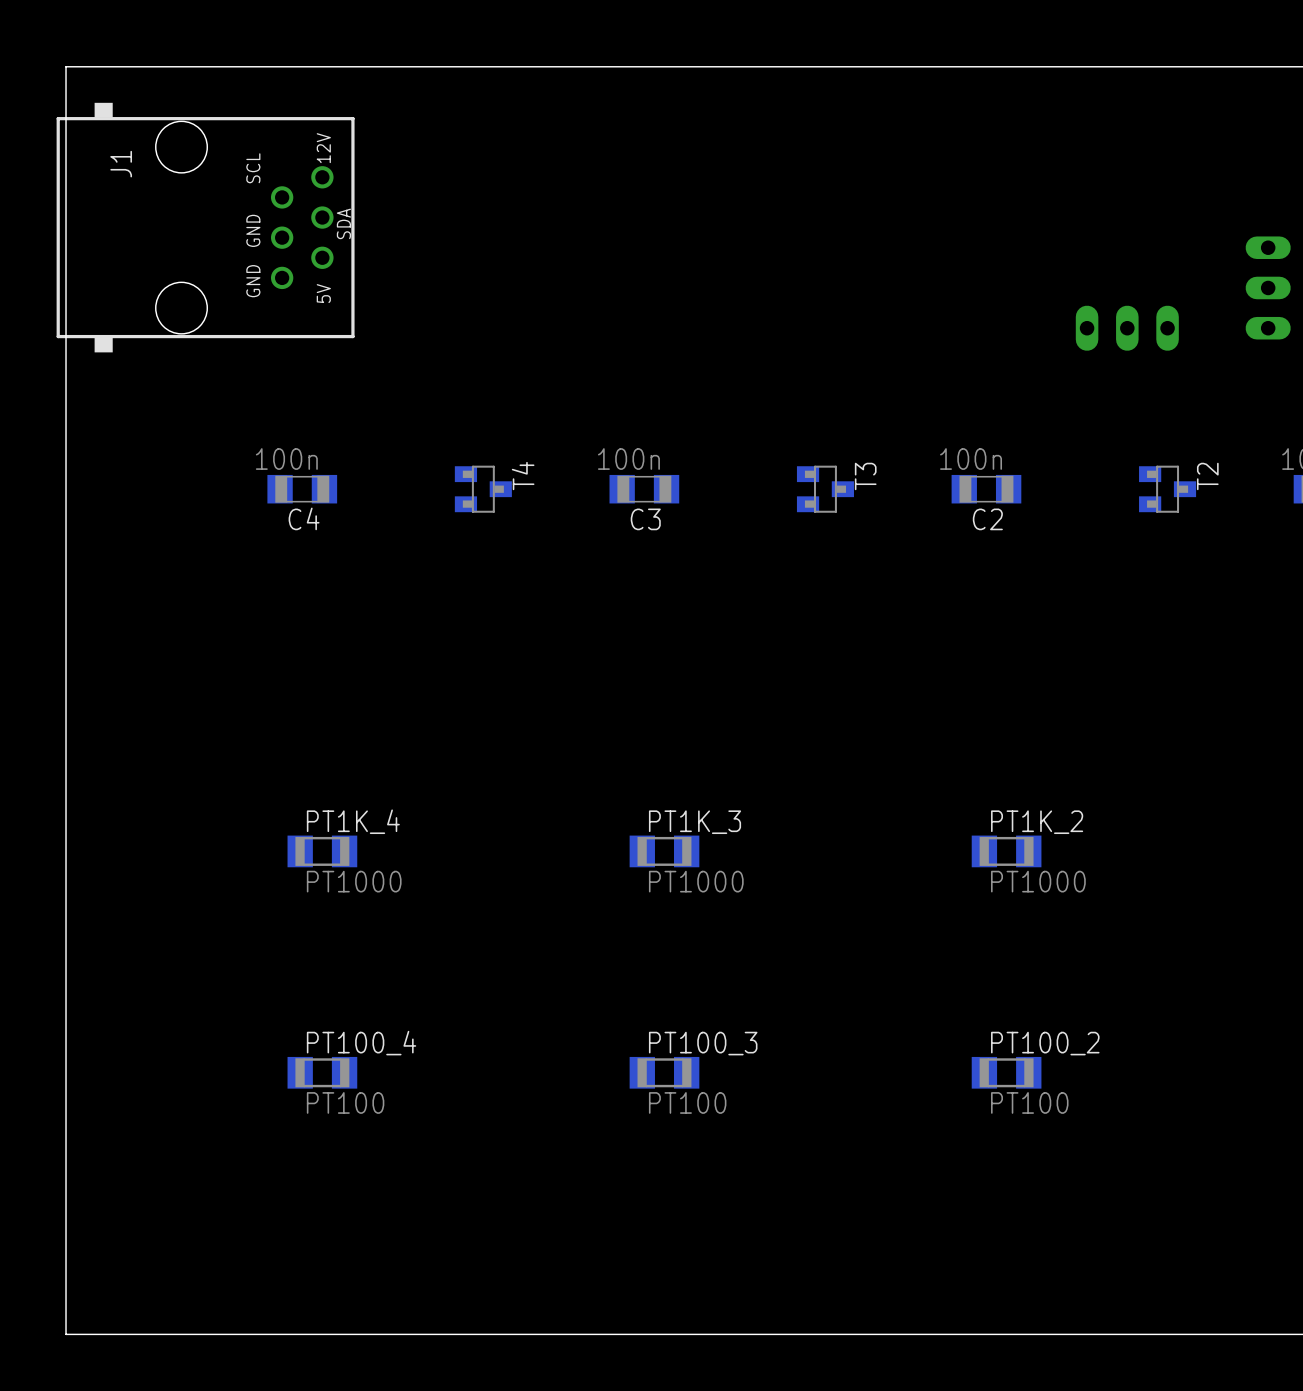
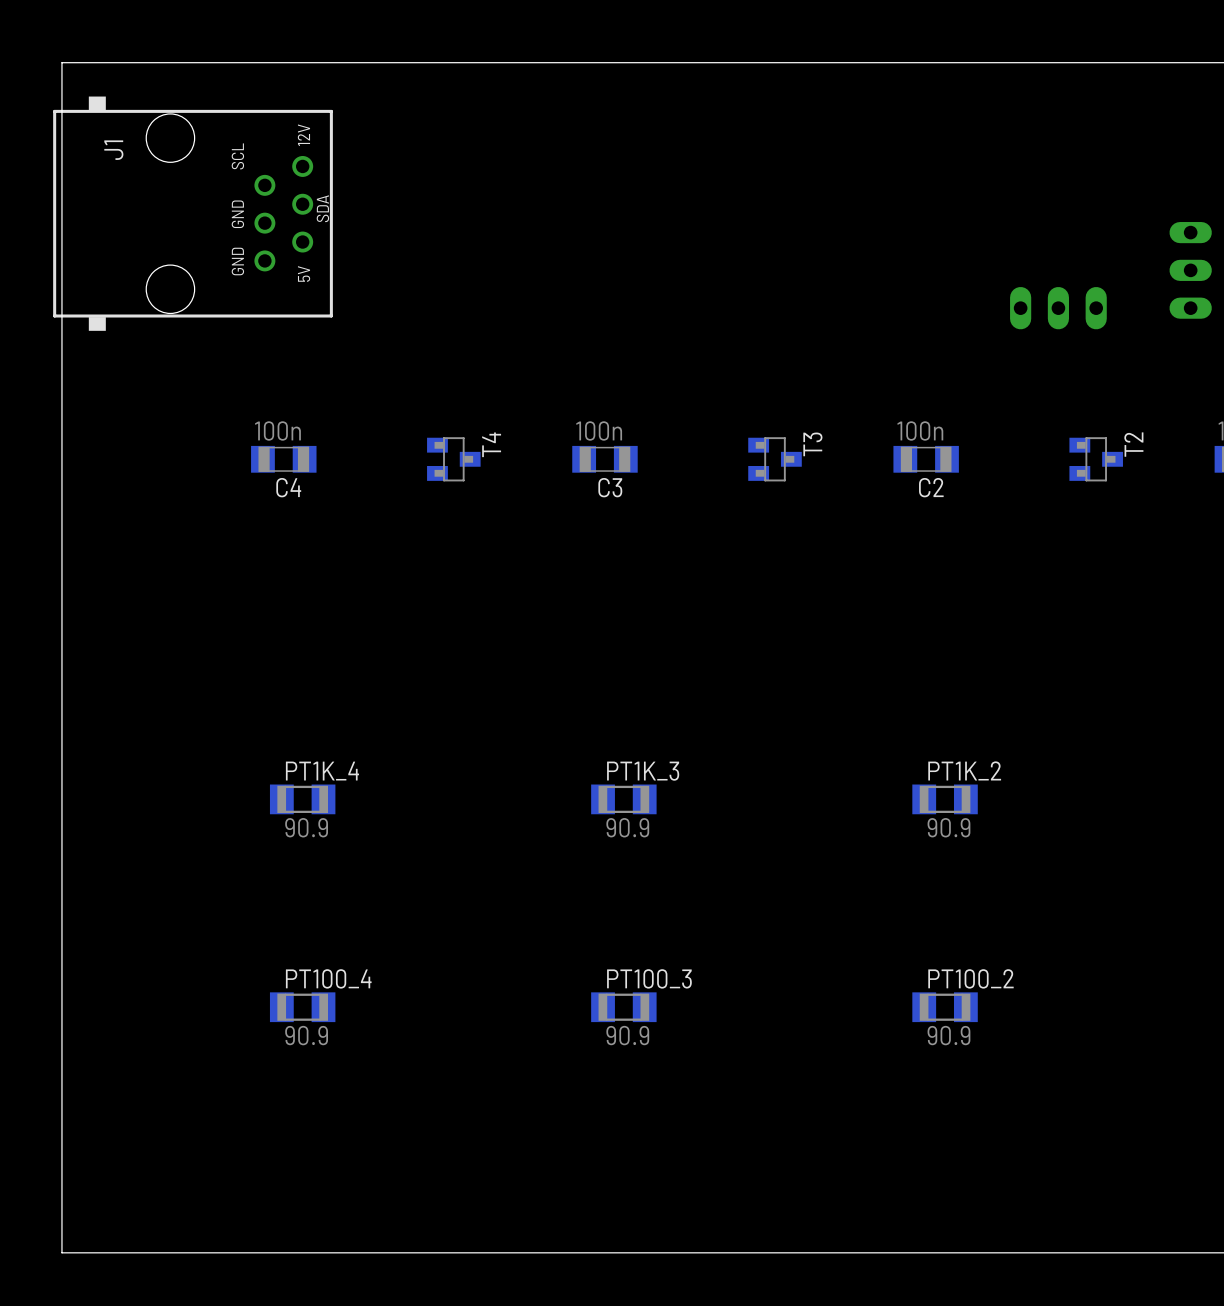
PT1K_4 value: PT1000 (354, 881) -> 90.9 (306, 827)
PT1K_3 value: PT1000 (696, 881) -> 90.9 (627, 827)
PT1K_2 value: PT1000 (1038, 881) -> 90.9 (948, 827)
PT100_4 value: PT100 (345, 1102) -> 90.9 (306, 1035)
PT100_3 value: PT100 (687, 1102) -> 90.9 (627, 1035)
PT100_2 value: PT100 (1029, 1102) -> 90.9 (948, 1035)

